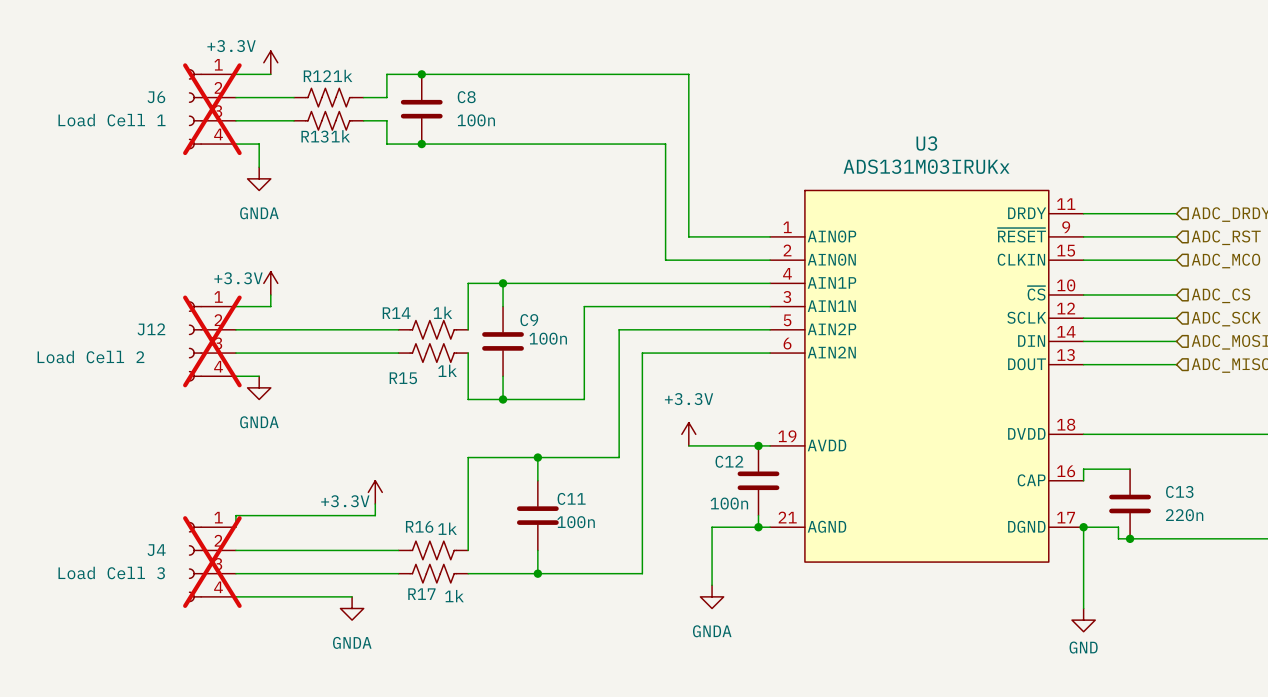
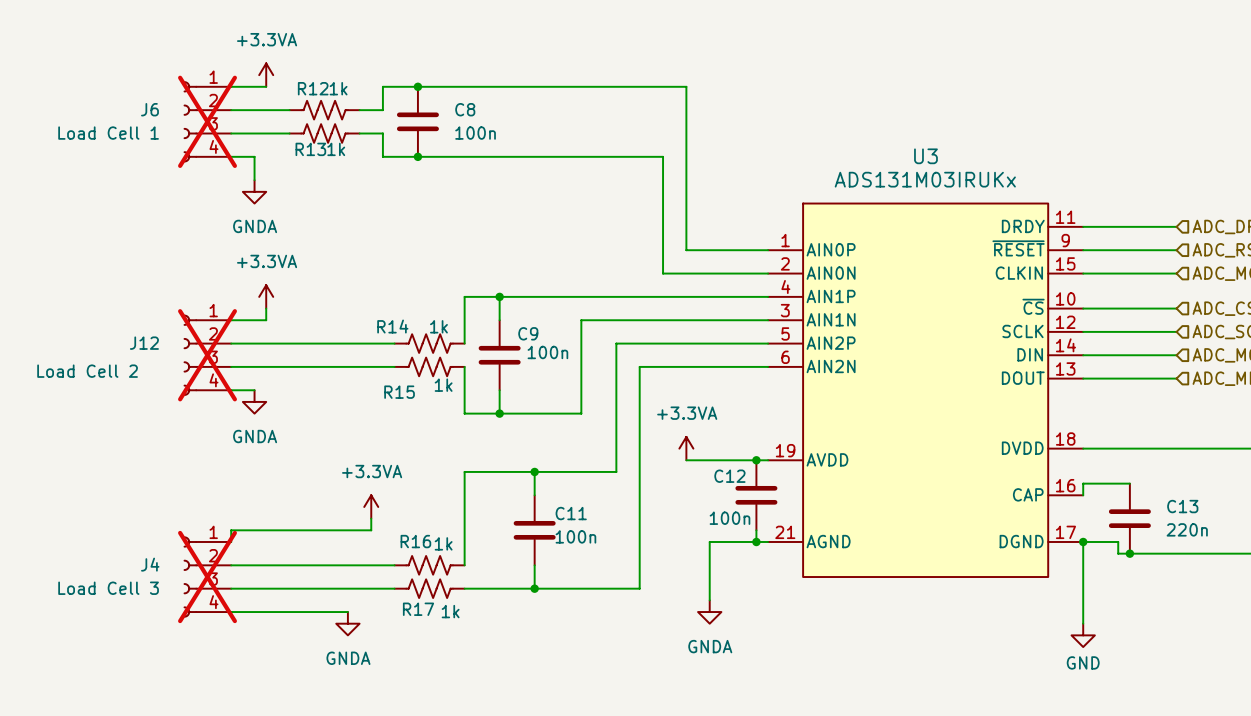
power symbol: +3.3V (270, 62) -> +3.3VA (266, 75)
power symbol: +3.3V (270, 283) -> +3.3VA (266, 296)
power symbol: +3.3V (688, 434) -> +3.3VA (686, 448)
power symbol: +3.3V (375, 492) -> +3.3VA (371, 506)

